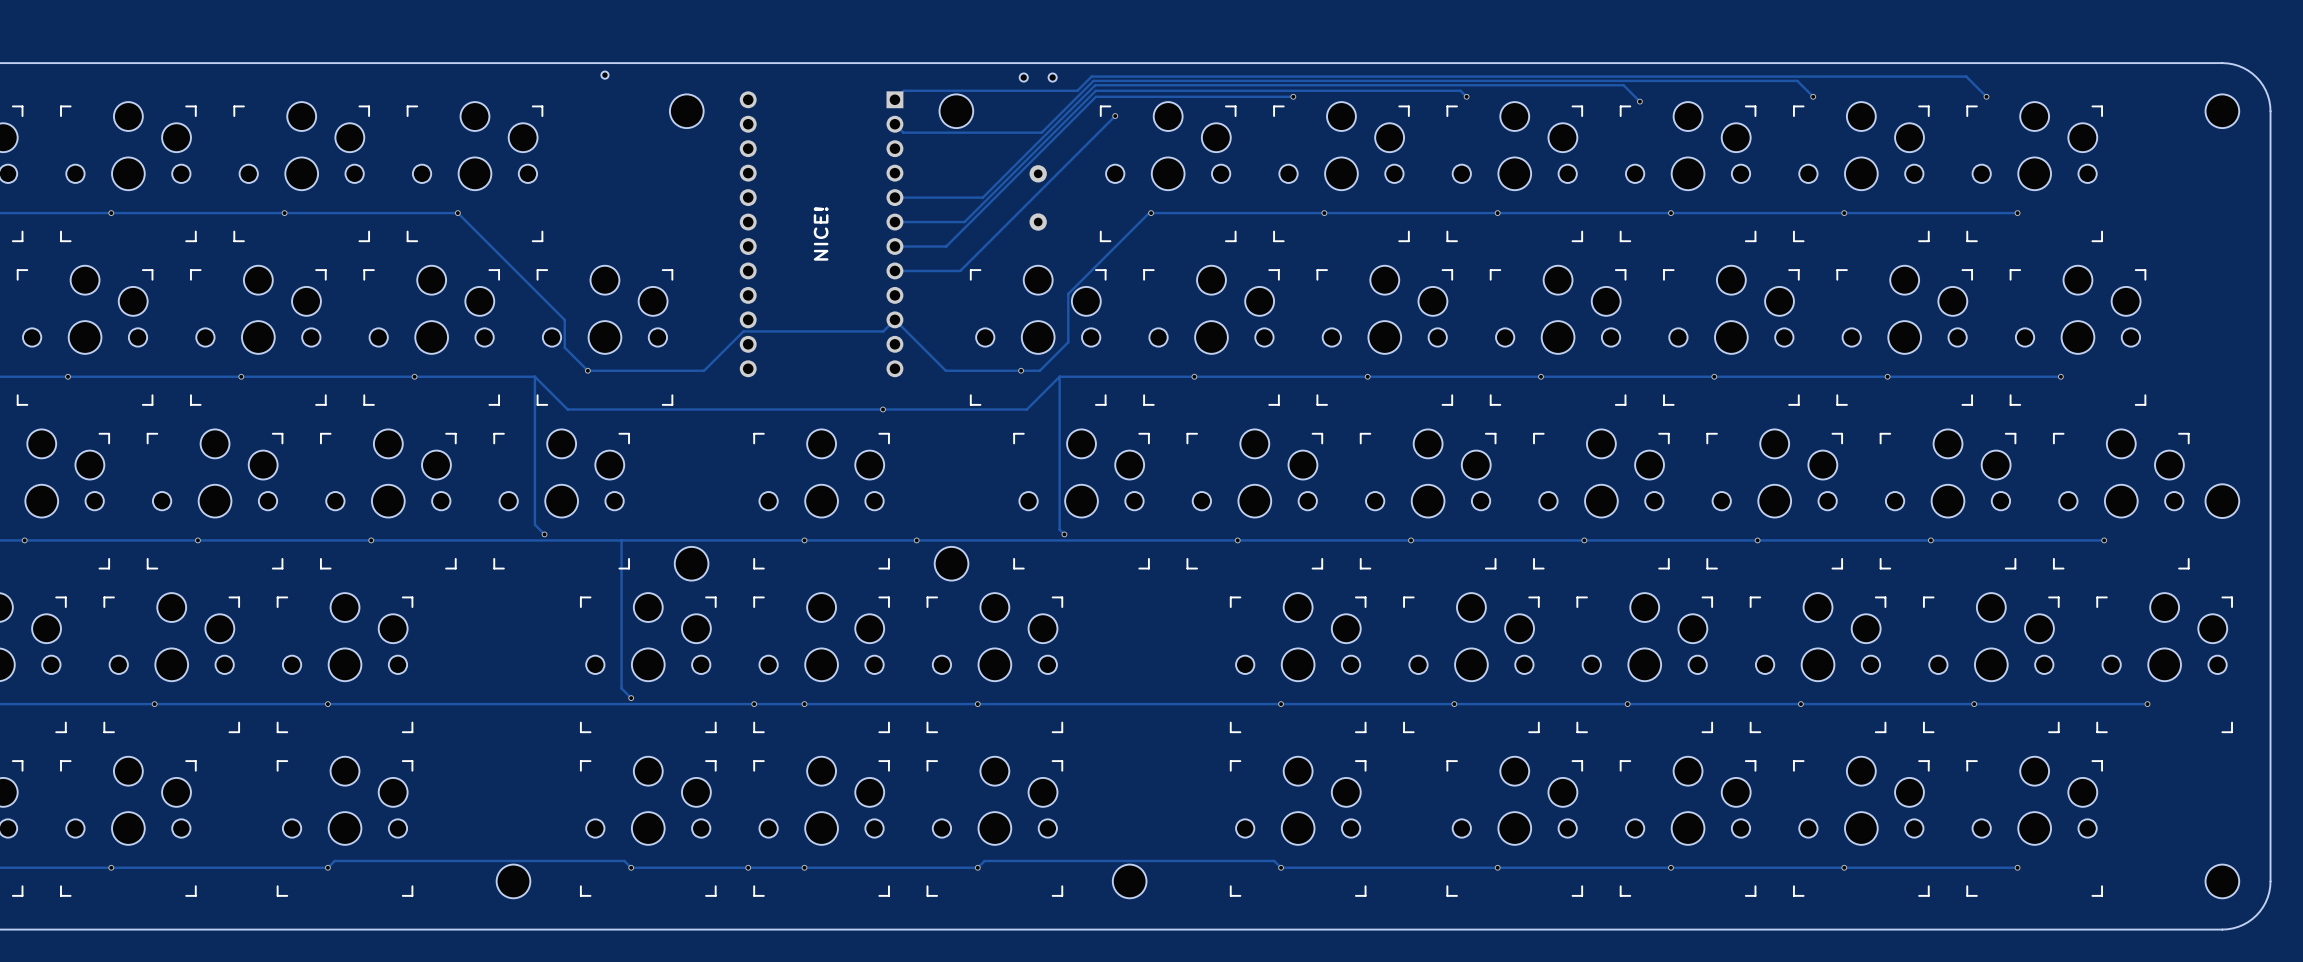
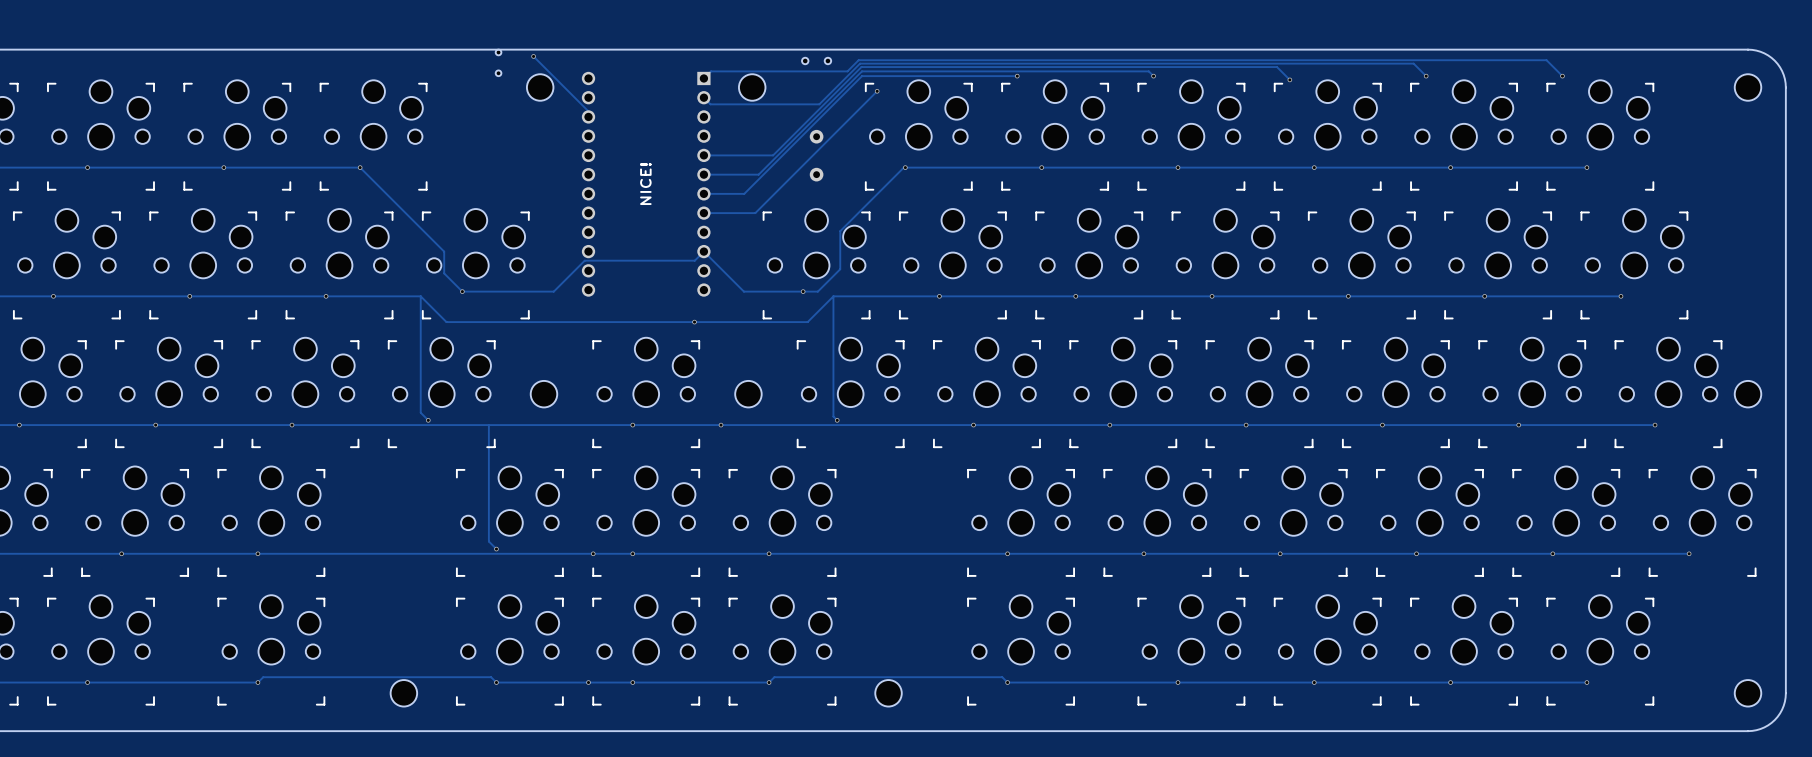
track: none -> (533, 56) (588, 111) (588, 116)
via: none -> (533, 56)
part: (604, 75) -> none
part: none -> (498, 62)
part position: (691, 563) -> (543, 394)
part position: (951, 563) -> (748, 394)

